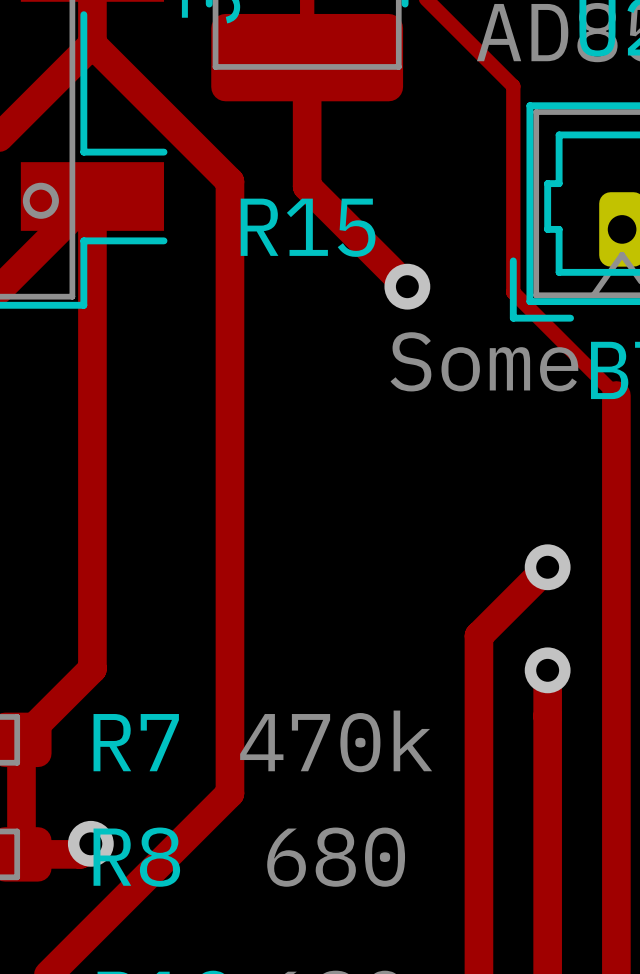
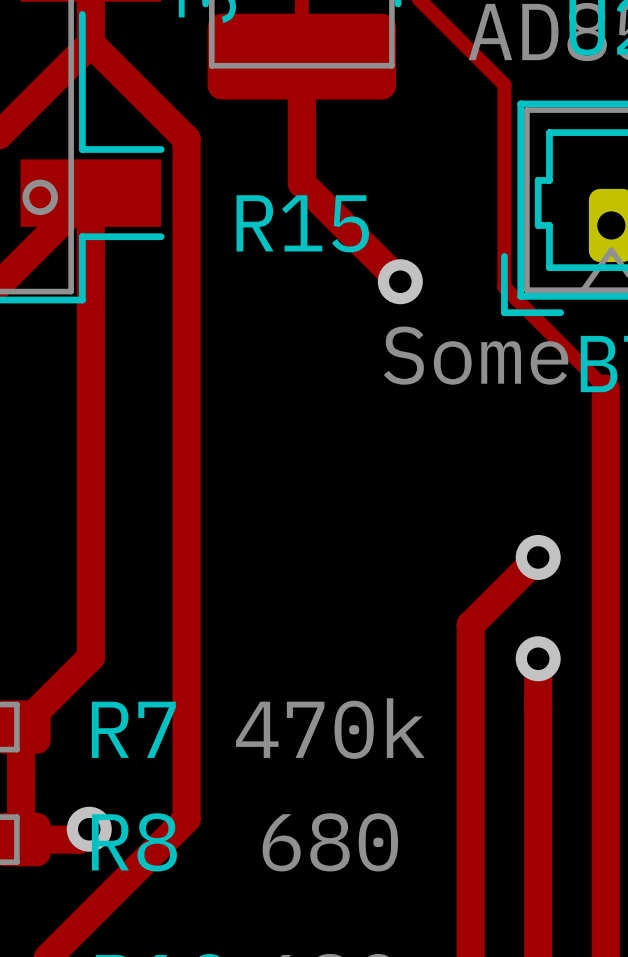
track: (189, 141) (229, 181) (229, 793) (189, 833) -> (186, 139) (186, 819)

